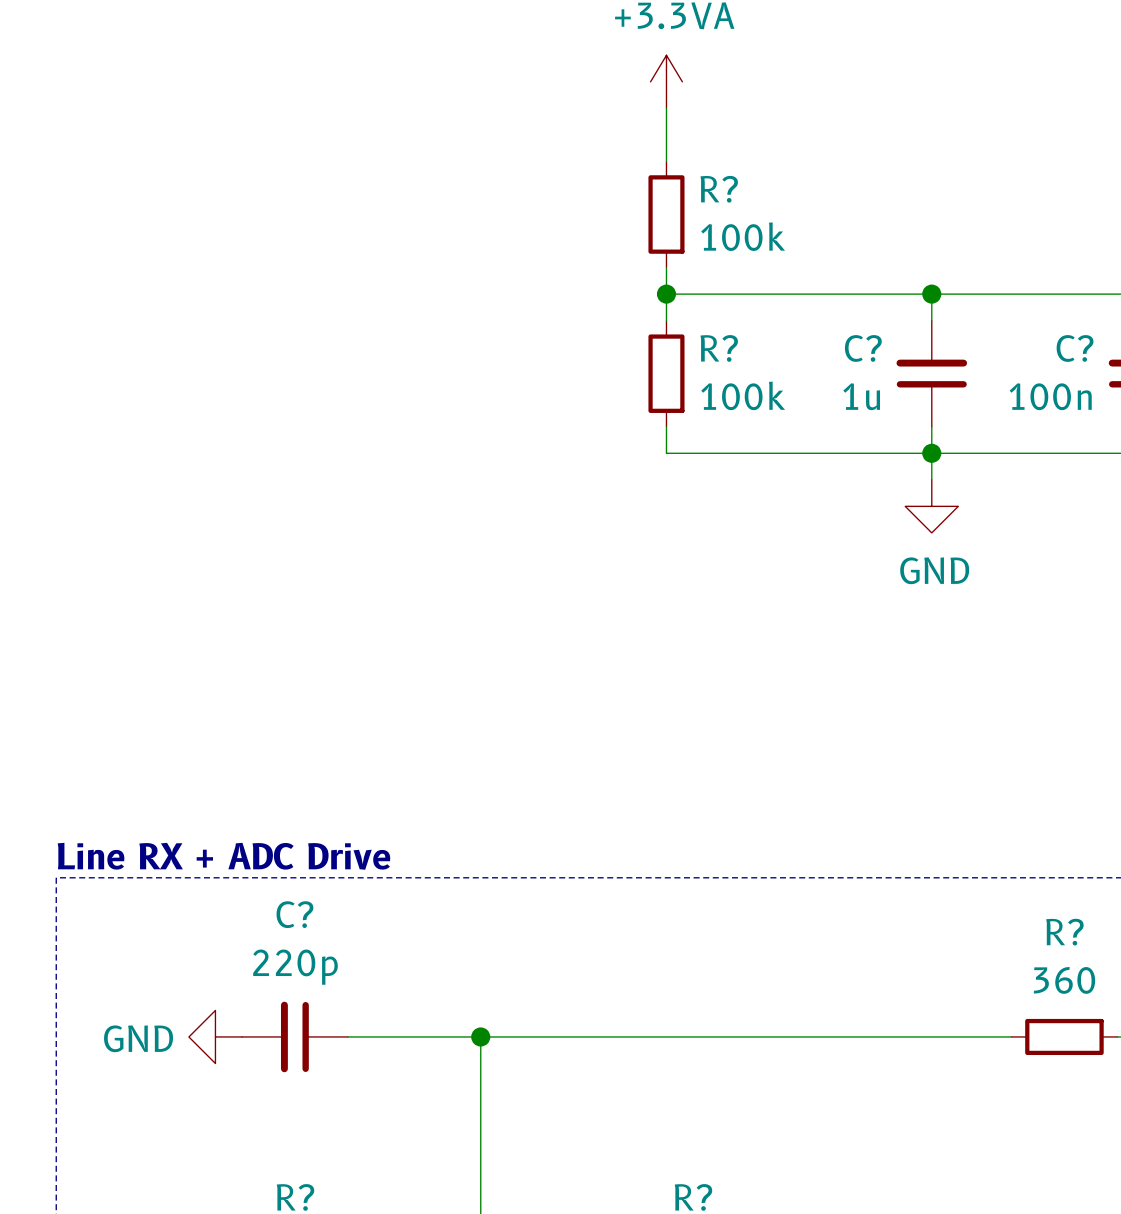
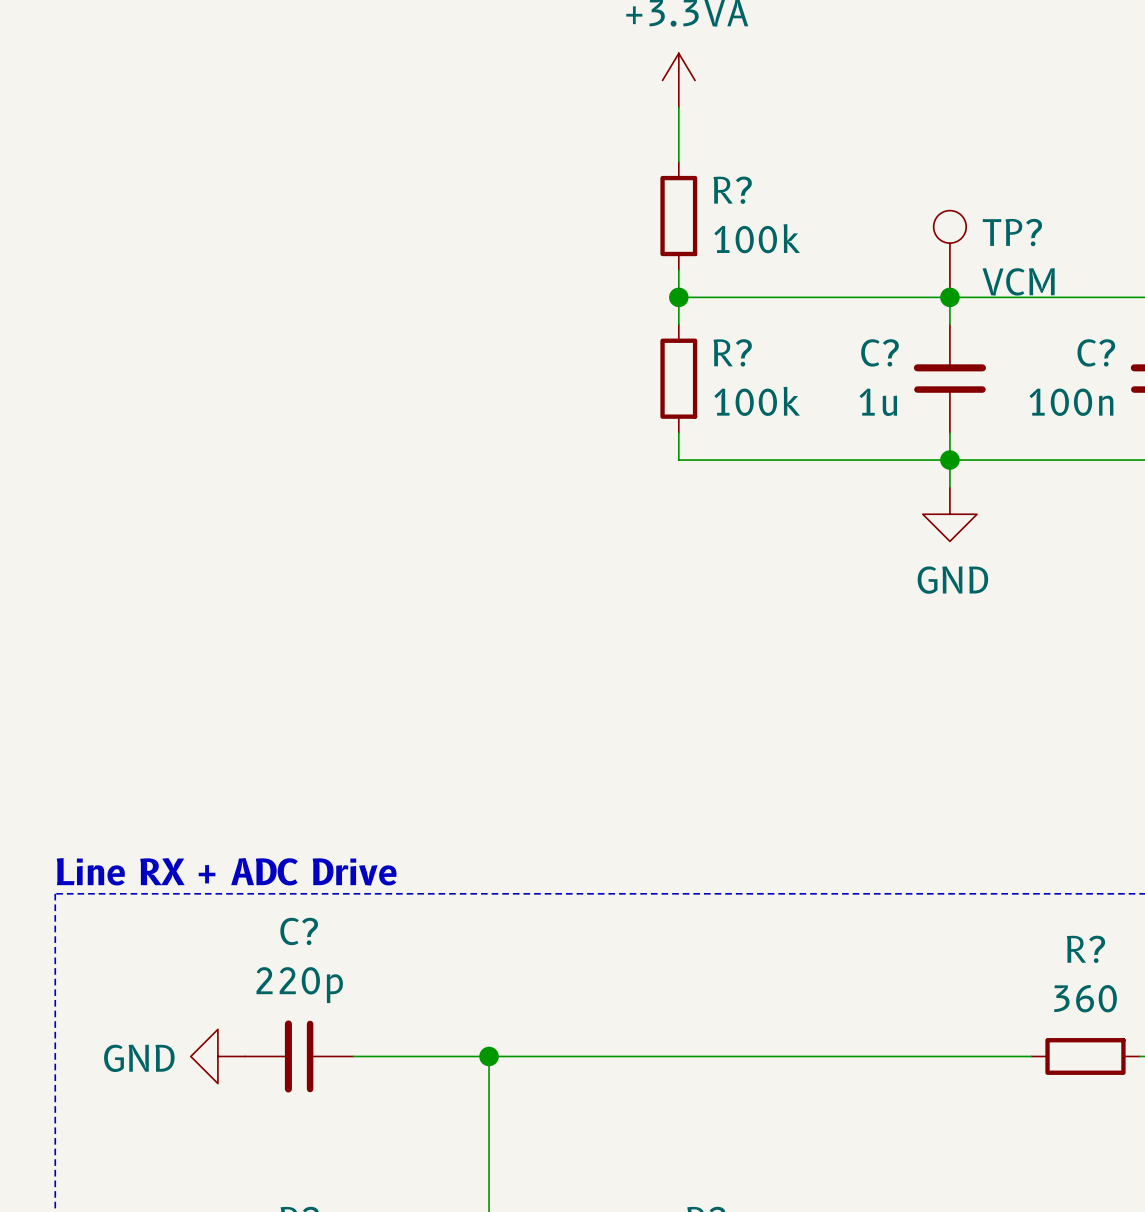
TP?: none -> VCM (949, 253)

